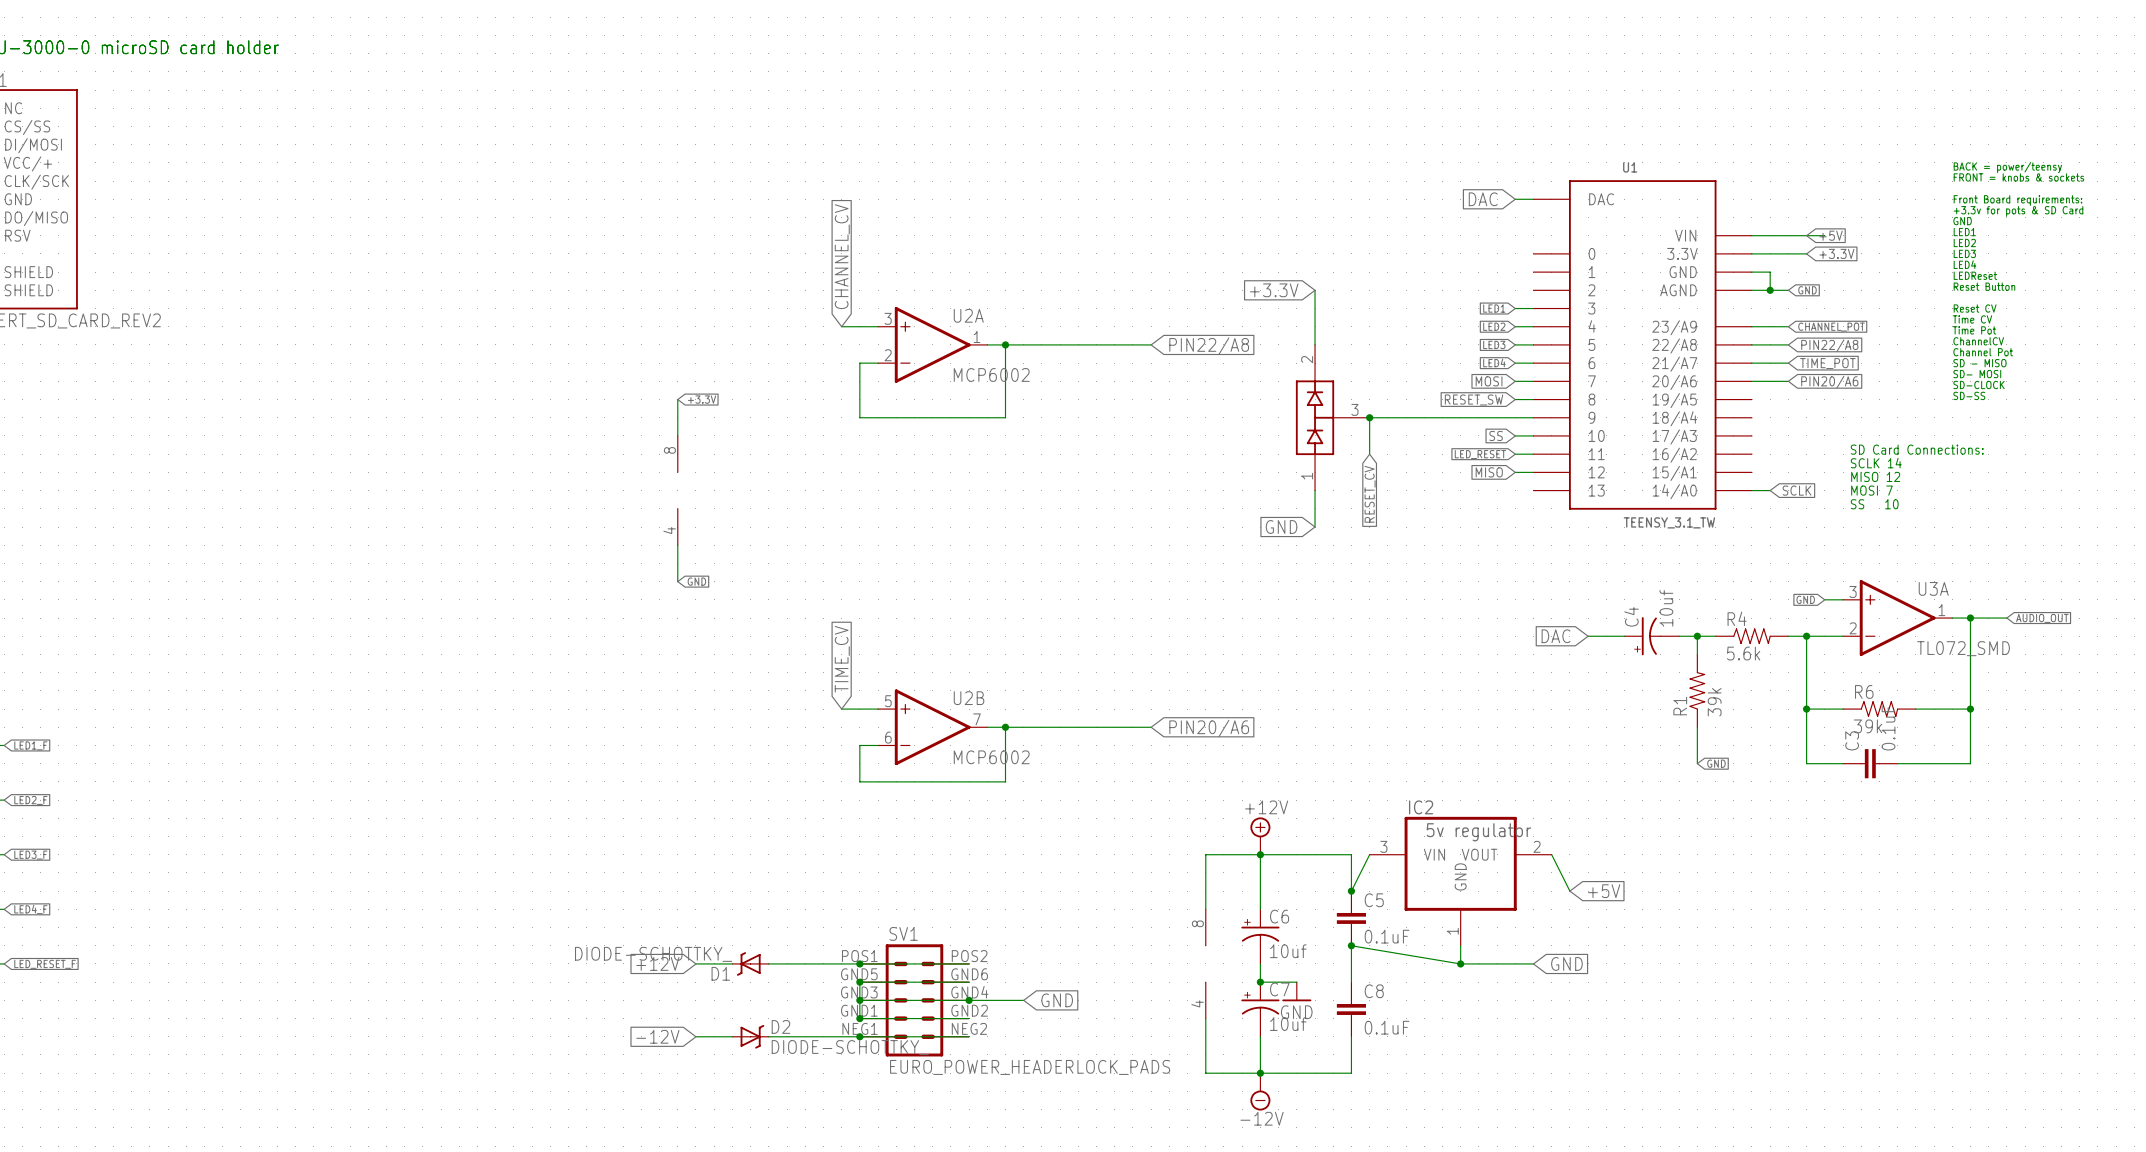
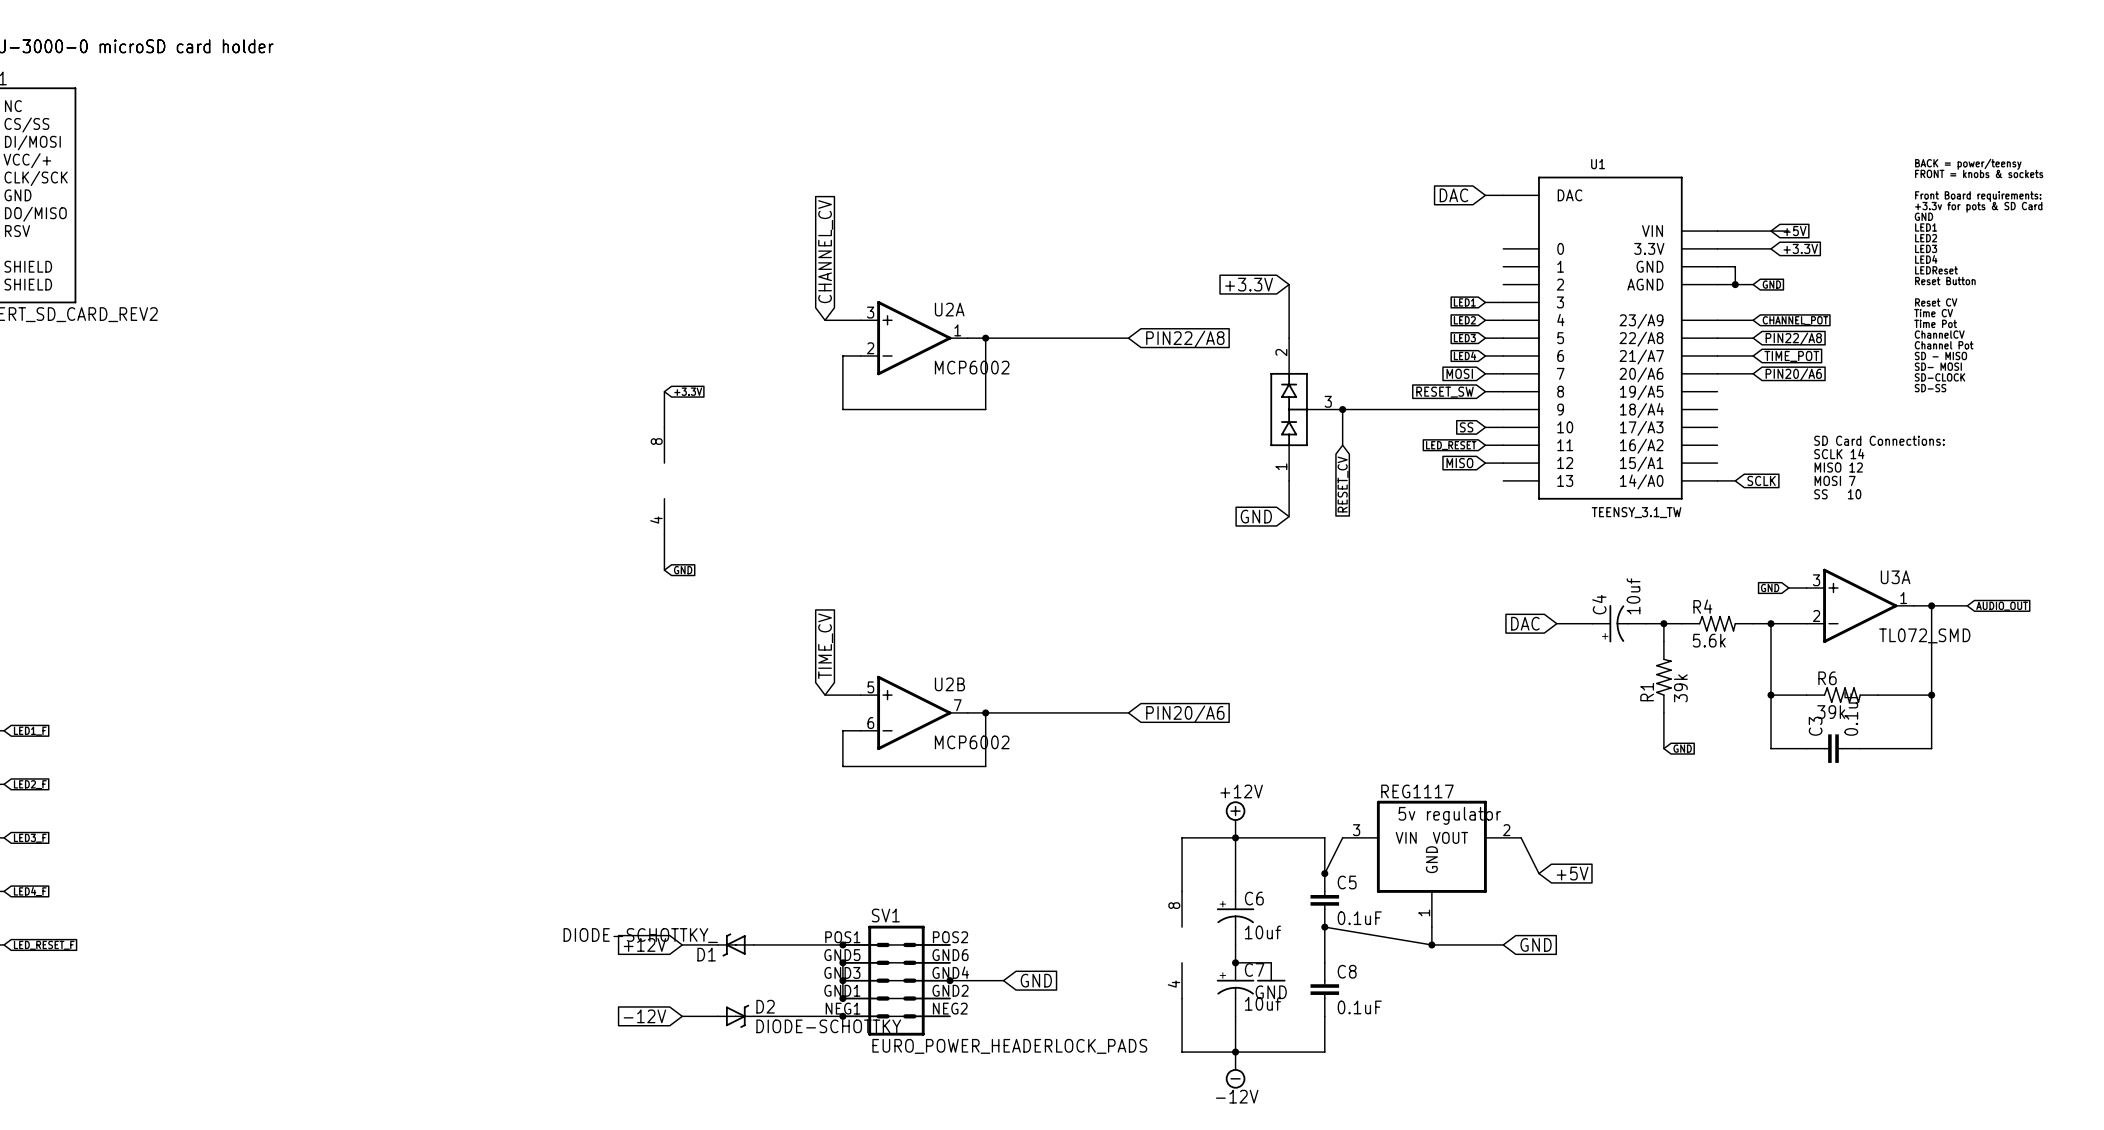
IC2 name: IC2 (1421, 807) -> REG1117 (1417, 791)

